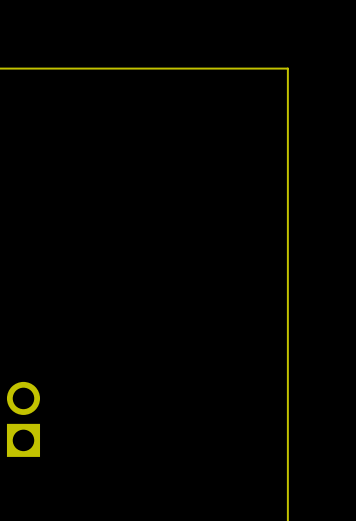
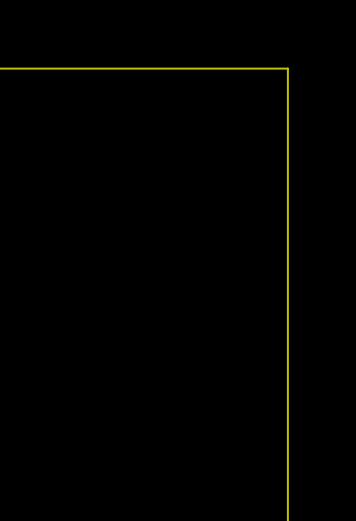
part: (23, 419) -> none

